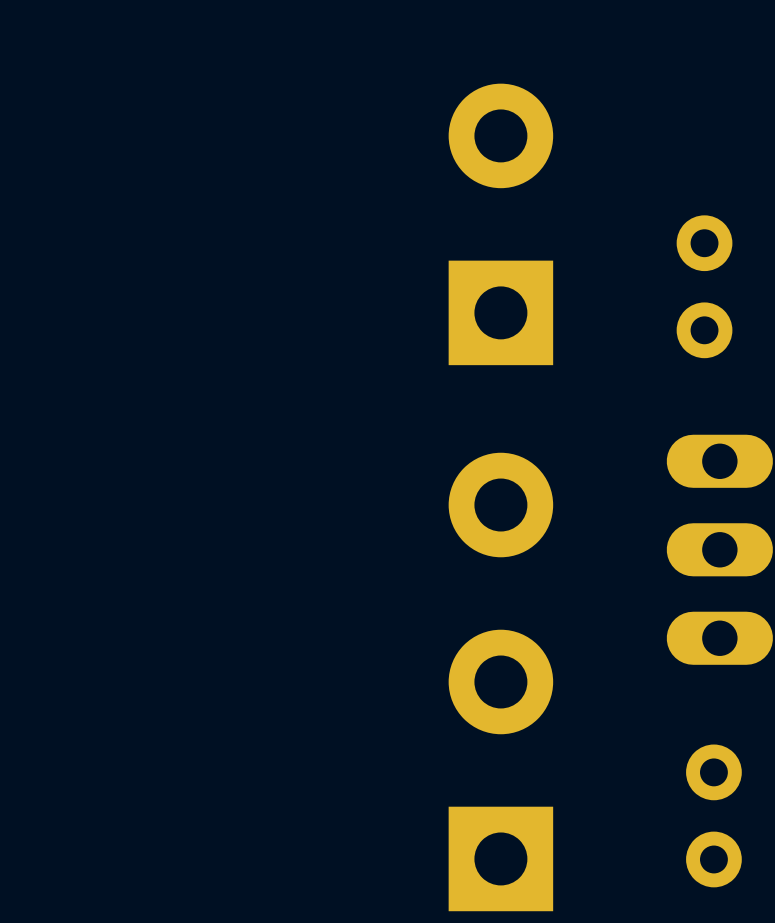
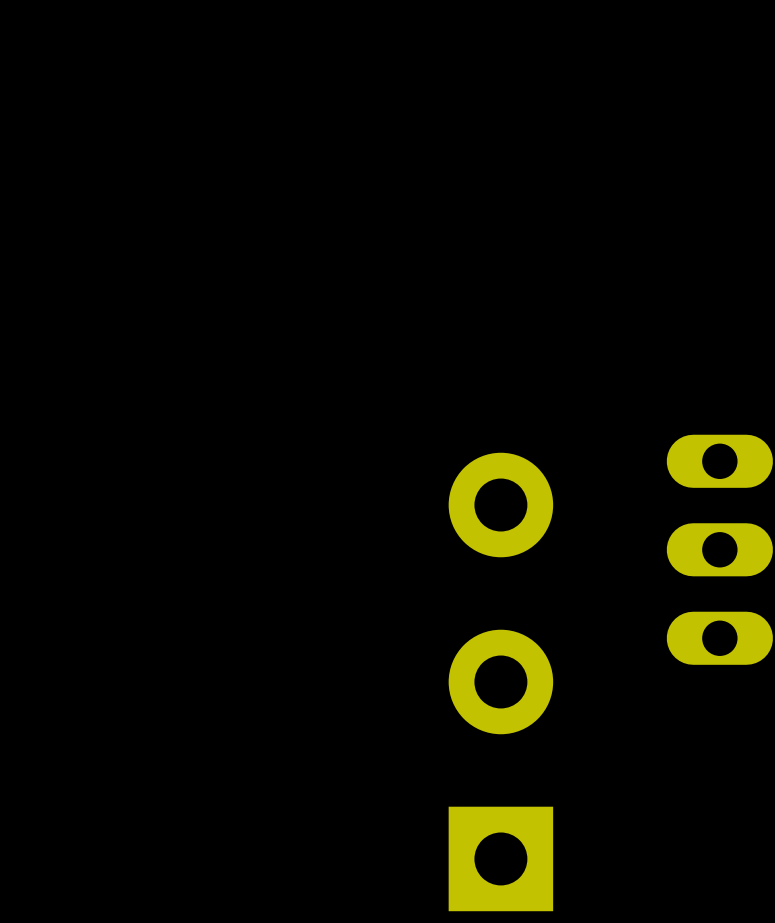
part: (500, 224) -> none
part: (704, 286) -> none
part: (713, 815) -> none

